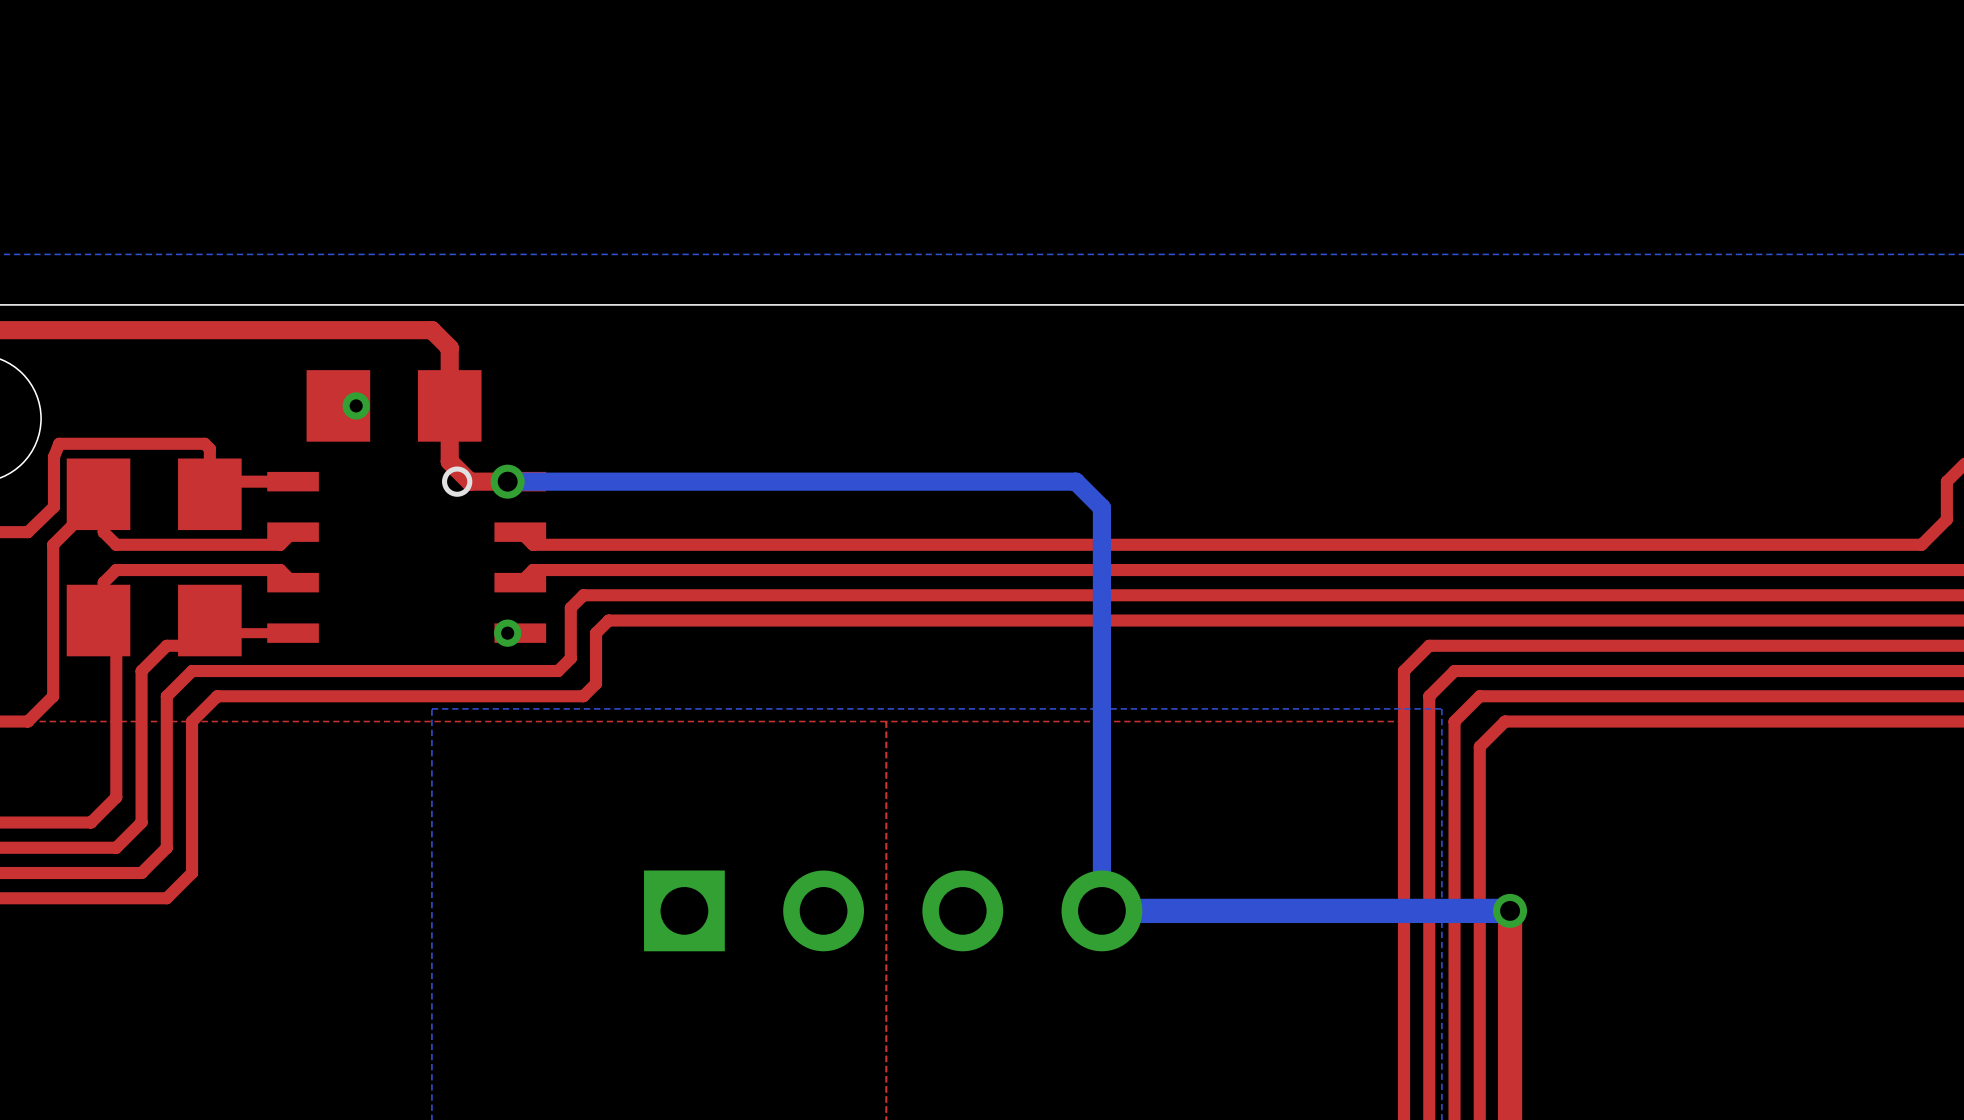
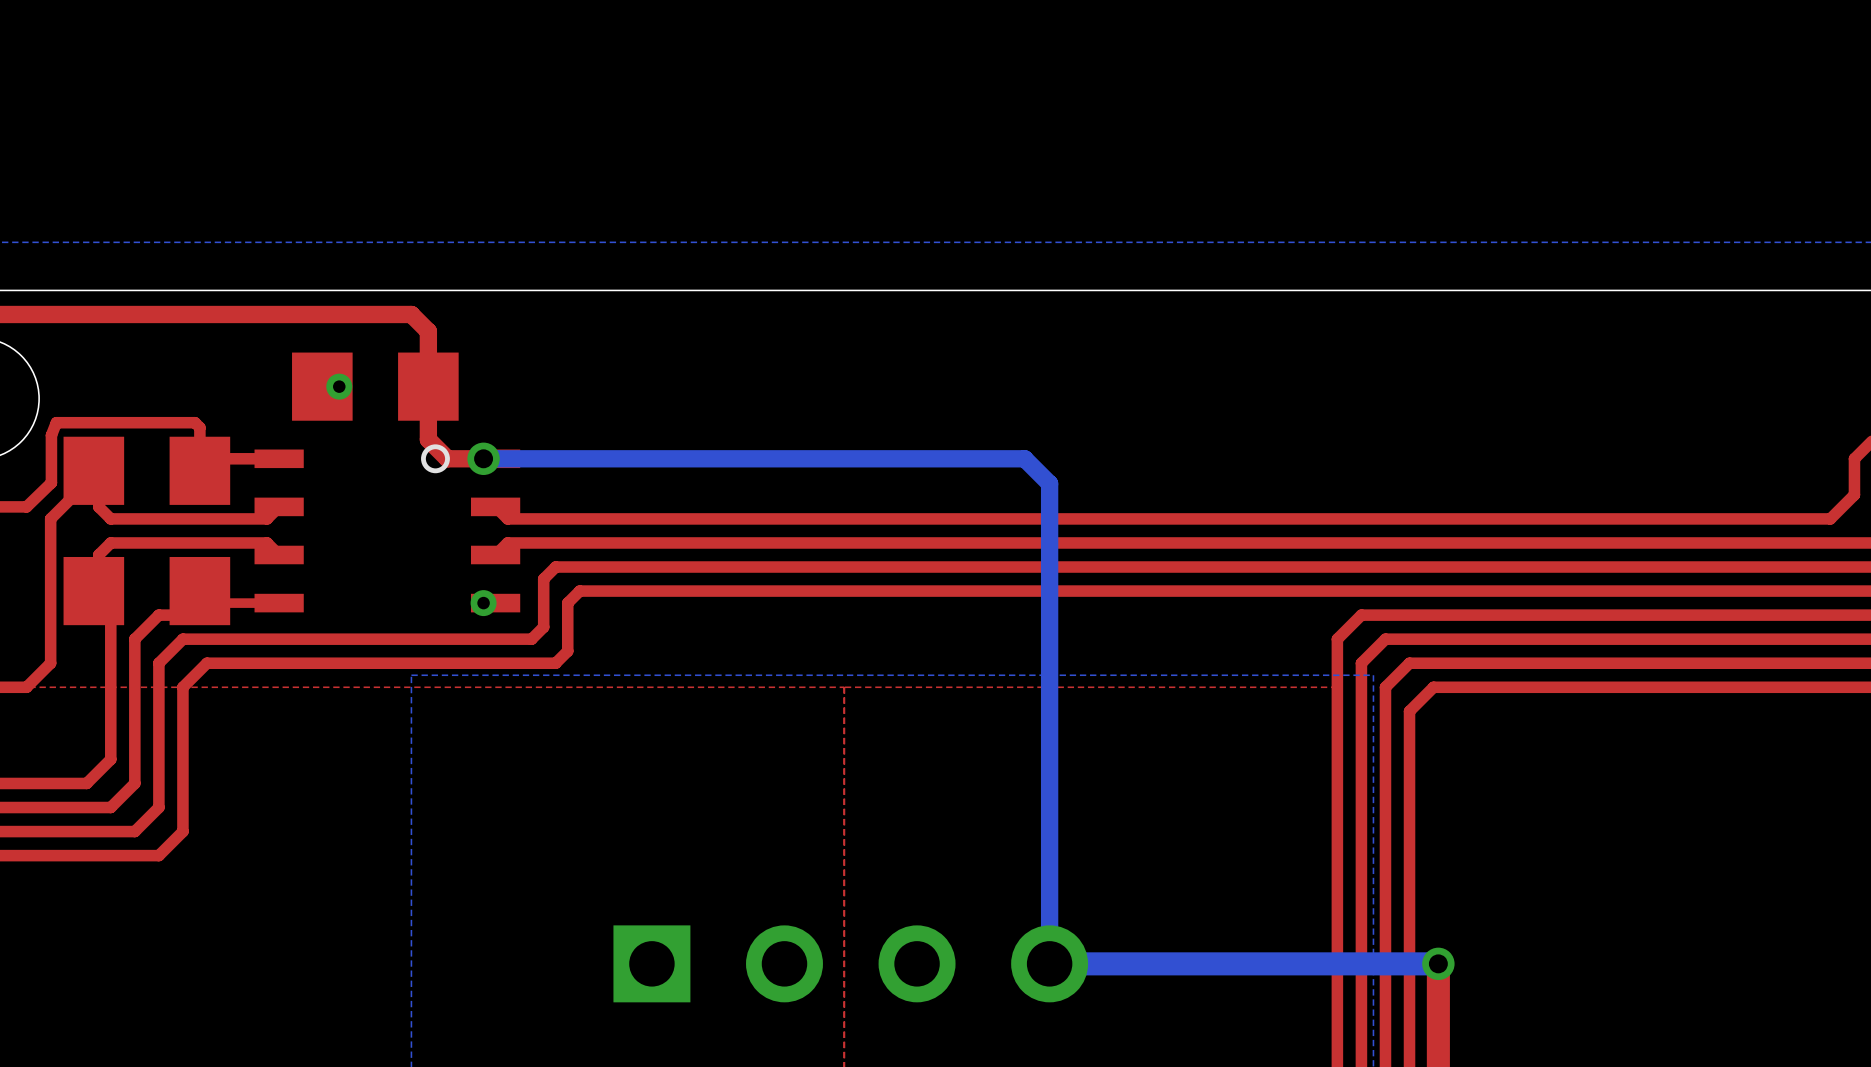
part position: (893, 910) -> (850, 963)
top track: (1510, 910) (1510, 1011) -> none
bottom track: (1510, 910) (1101, 910) -> (1438, 963) (1049, 963) (1049, 867)
via position: (1510, 910) -> (1438, 963)

